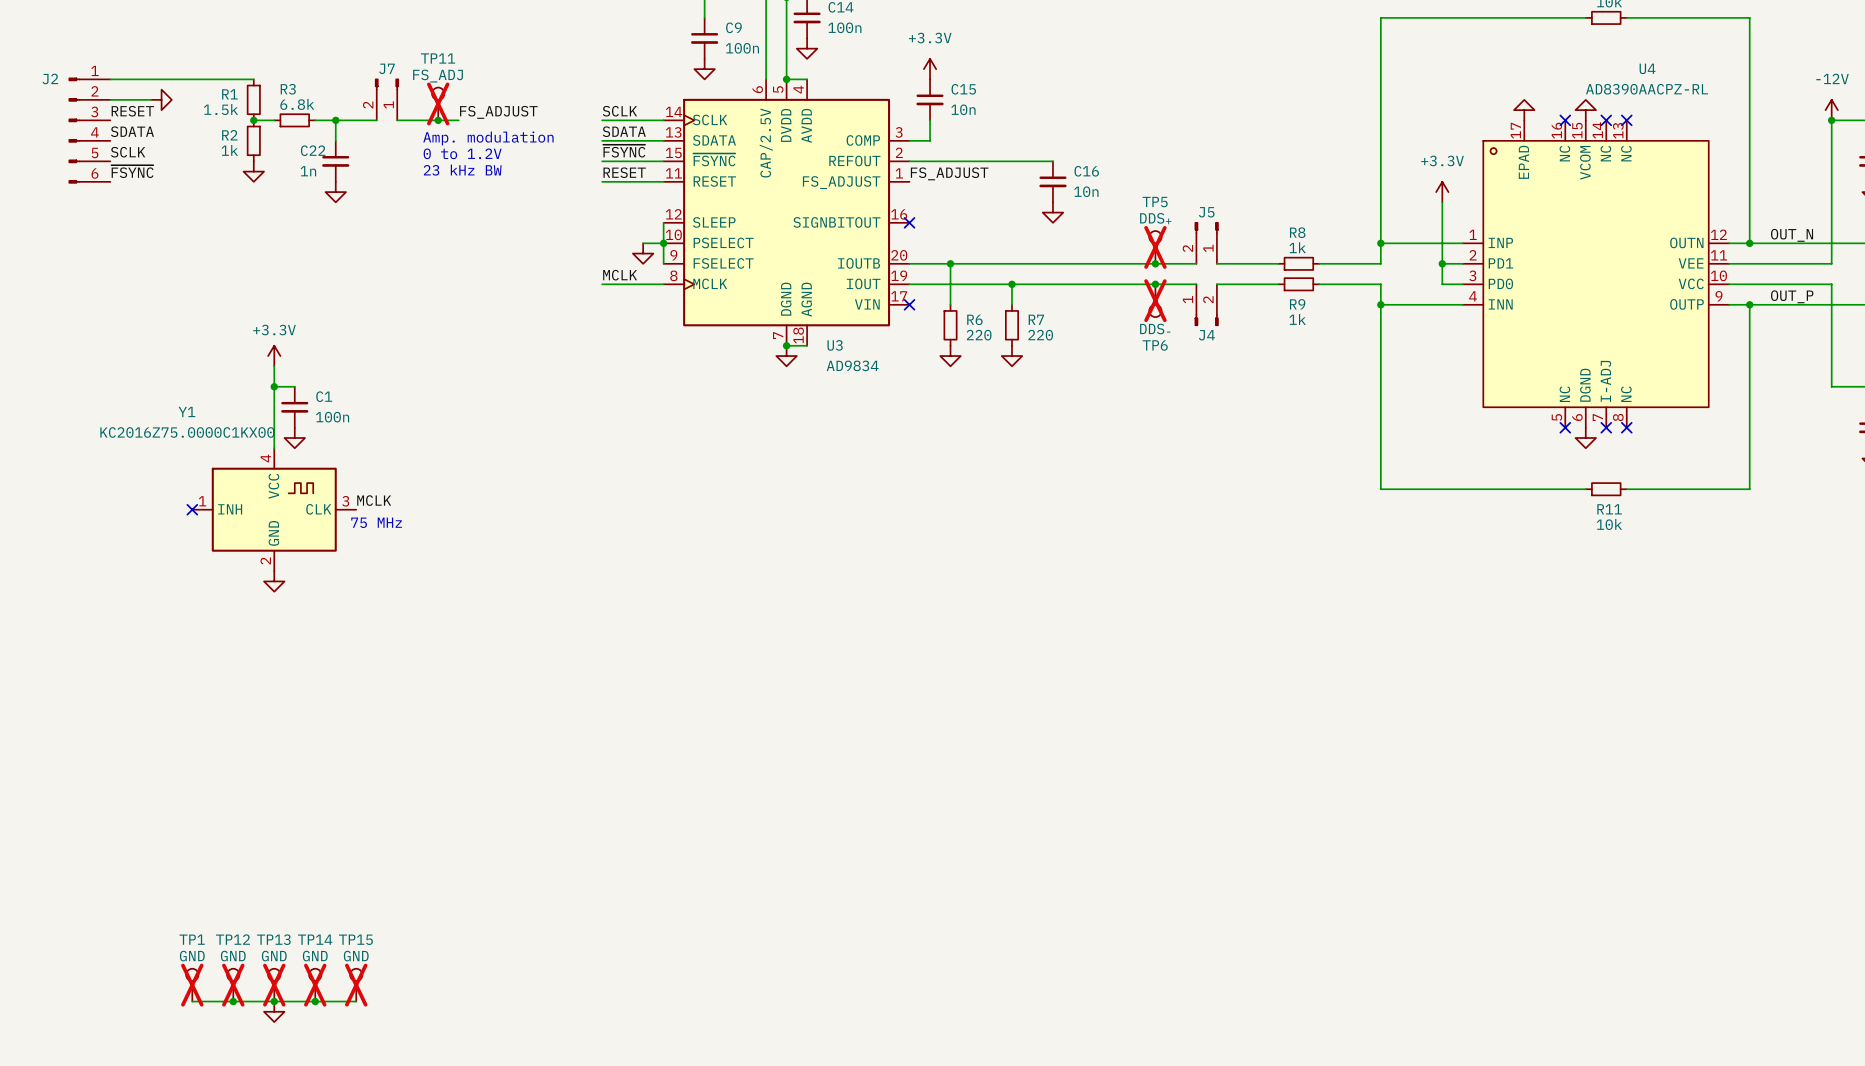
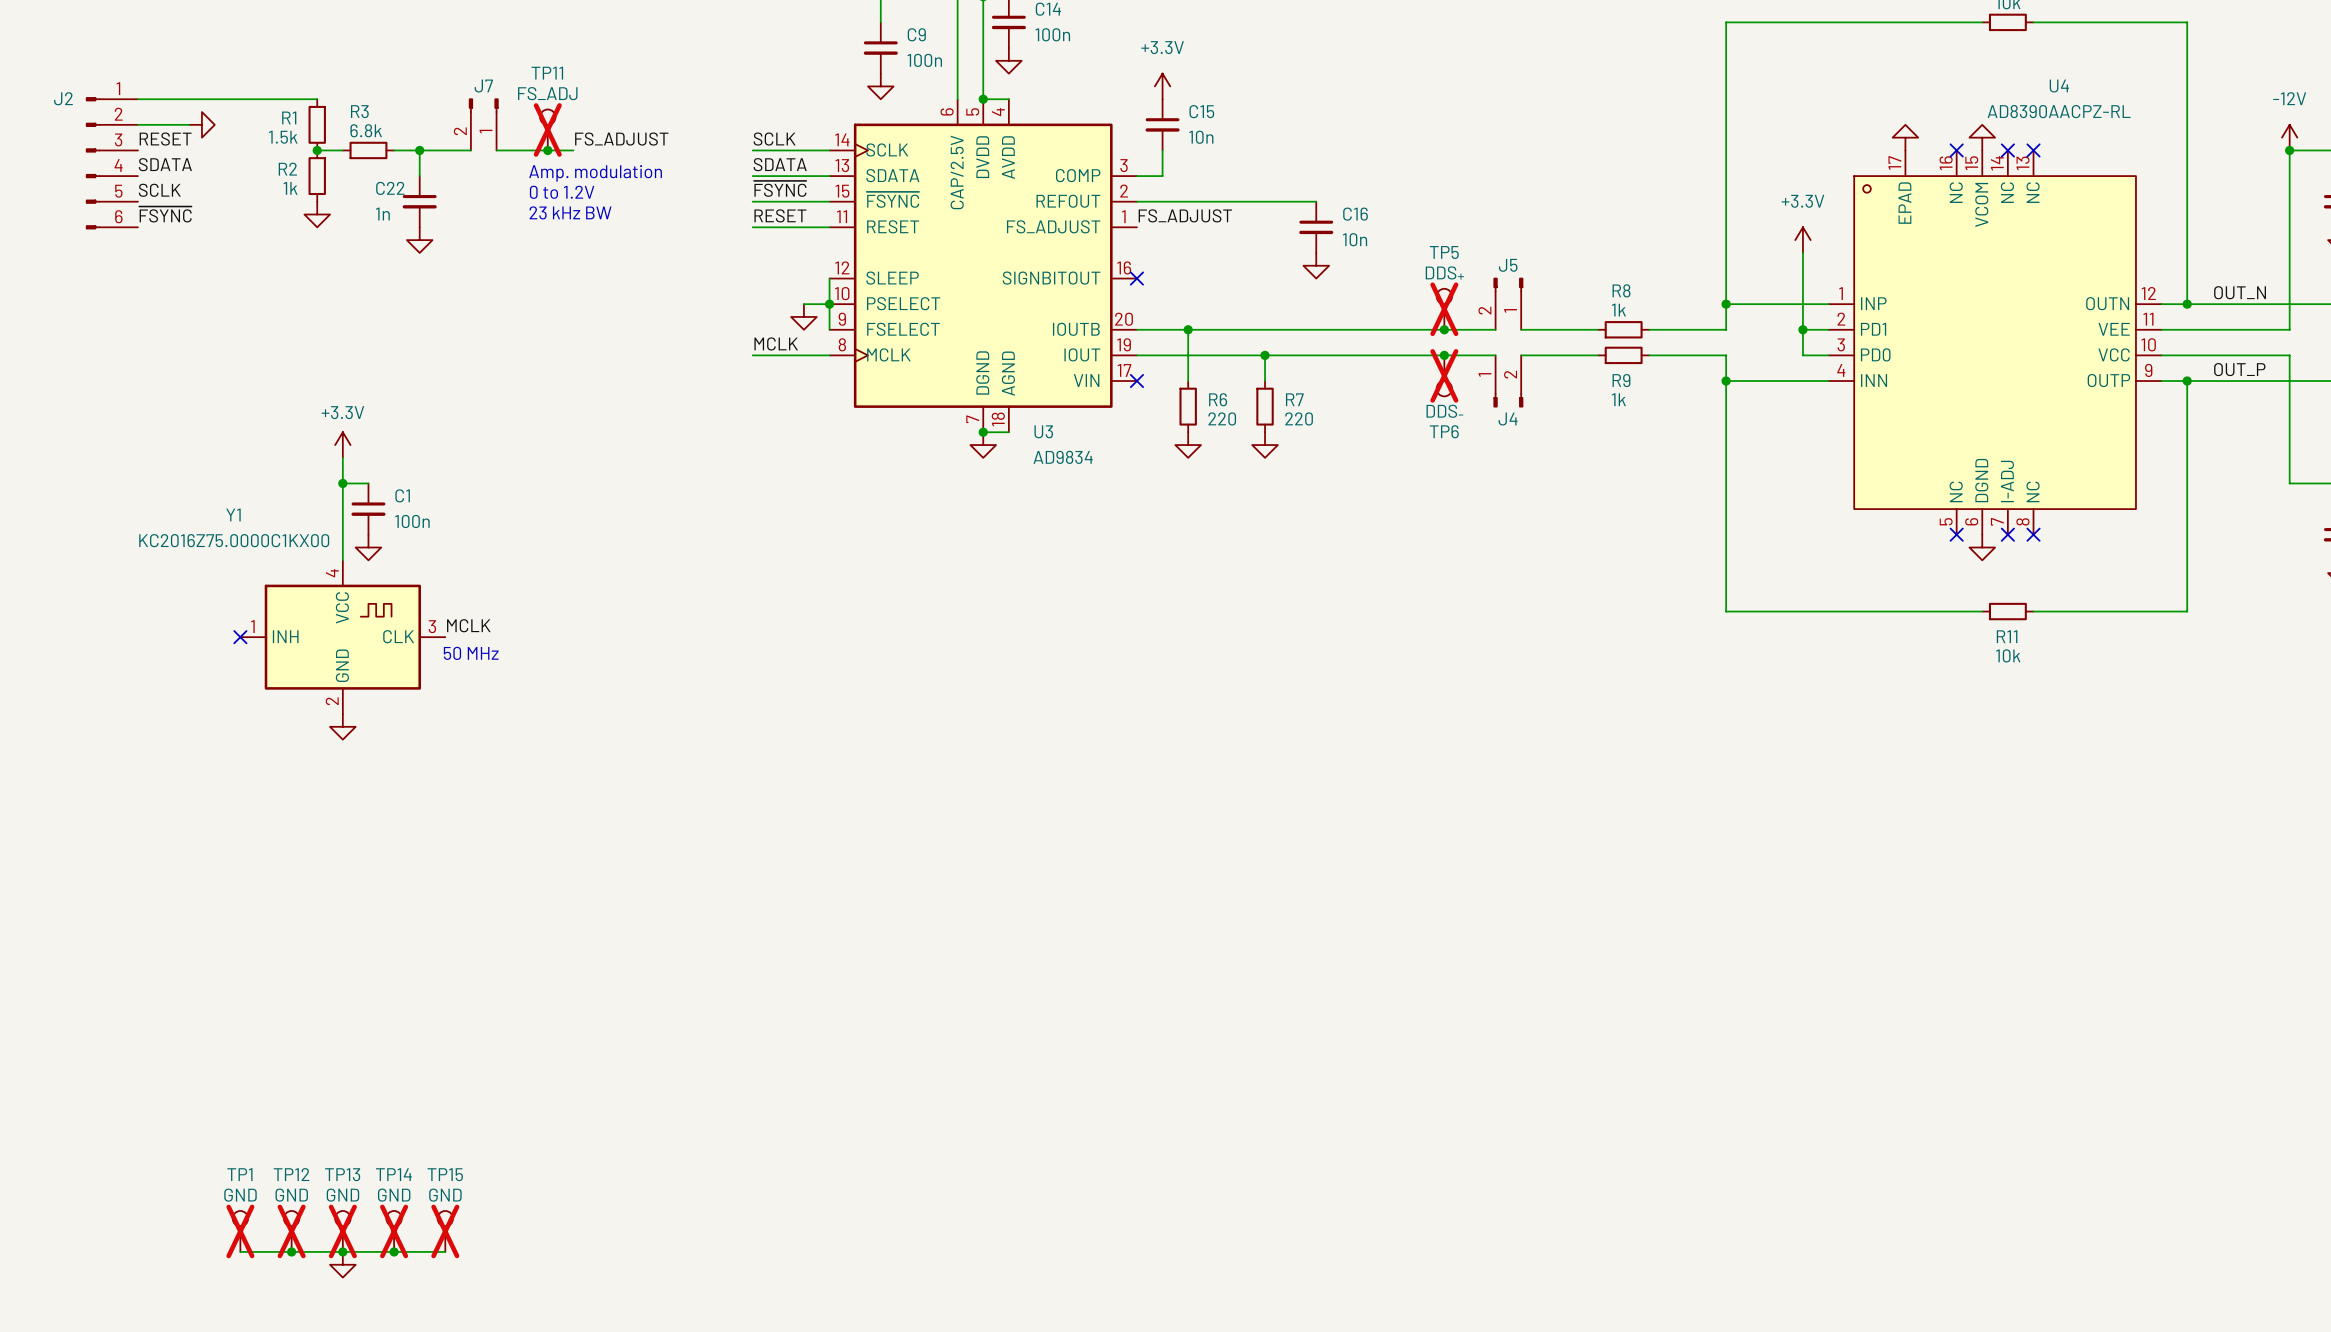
text: 75 MHz (376, 522) -> 50 MHz (471, 653)

